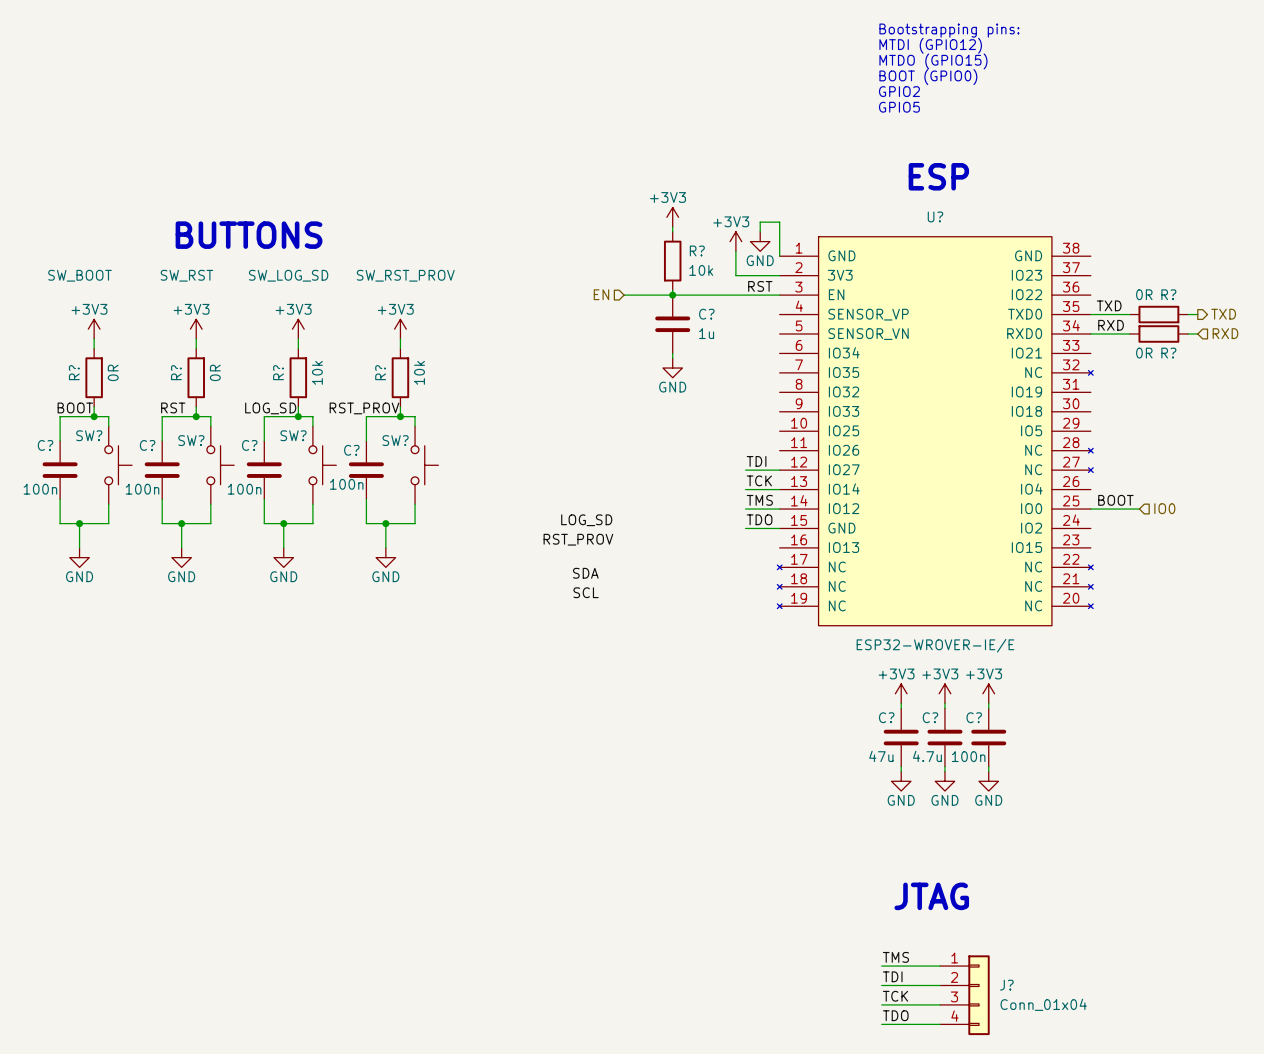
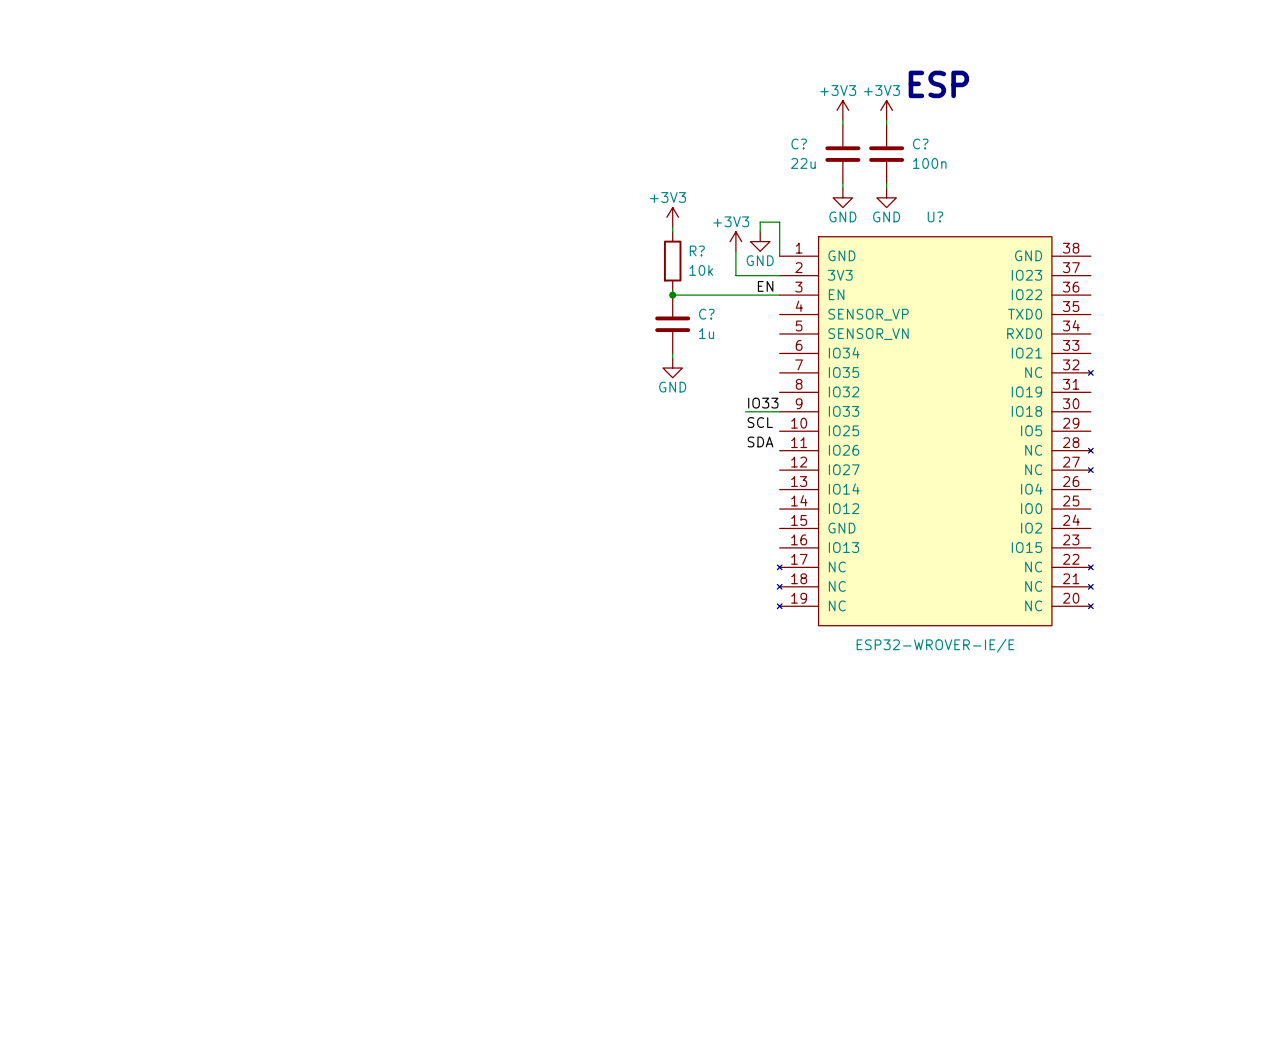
text: Bootstrapping pins: (949, 30) -> none
text: MTDI (GPIO12) (930, 45) -> none
text: MTDO (GPIO15) (933, 61) -> none
text: BOOT (GPIO0) (928, 77) -> none
text: GPIO2 (899, 91) -> none
text: GPIO5 (899, 107) -> none
power symbol: none -> +3V3 (842, 110)
power symbol: none -> +3V3 (886, 110)
wire: none -> (842, 120) (842, 124)
wire: none -> (886, 120) (886, 124)
C?: none -> 22u (842, 154)
C?: none -> 100n (886, 154)
text position: ESP (938, 176) -> ESP (938, 84)
wire: none -> (842, 183) (842, 188)
wire: none -> (886, 183) (886, 188)
power symbol: none -> GND (842, 197)
power symbol: none -> GND (886, 197)
text: BUTTONS (249, 235) -> none
label: RST (760, 286) -> none
label: none -> EN (765, 286)
hierarchical label: EN (601, 294) -> none
wire: (624, 295) (672, 295) -> none
label: TXD (1109, 305) -> none
wire: (1090, 314) (1129, 314) -> none
R?: 0R (1158, 314) -> none
wire: (1188, 314) (1197, 314) -> none
hierarchical label: TXD (1223, 314) -> none
label: RXD (1111, 325) -> none
power symbol: +3V3 (94, 329) -> none
power symbol: +3V3 (196, 329) -> none
power symbol: +3V3 (298, 329) -> none
power symbol: +3V3 (400, 329) -> none
wire: (1090, 333) (1129, 333) -> none
R?: 0R (1158, 333) -> none
wire: (1188, 333) (1197, 333) -> none
hierarchical label: RXD (1225, 333) -> none
wire: (94, 338) (94, 348) -> none
wire: (196, 338) (196, 348) -> none
wire: (298, 338) (298, 348) -> none
wire: (400, 338) (400, 348) -> none
R?: 0R (94, 377) -> none
R?: 0R (196, 377) -> none
R?: 10k (298, 377) -> none
R?: 10k (400, 377) -> none
label: none -> IO33 (763, 403)
wire: (94, 406) (94, 416) -> none
wire: (196, 406) (196, 416) -> none
wire: (298, 406) (298, 416) -> none
wire: (400, 406) (400, 416) -> none
label: BOOT (75, 407) -> none
label: RST (173, 407) -> none
label: LOG_SD (270, 408) -> none
label: RST_PROV (364, 408) -> none
junction: (94, 416) -> none
junction: (196, 416) -> none
junction: (298, 416) -> none
junction: (400, 416) -> none
label: none -> SCL (760, 422)
wire: (108, 426) (108, 416) (60, 416) (60, 440) -> none
wire: (210, 426) (210, 416) (162, 416) (162, 440) -> none
wire: (312, 426) (312, 416) (264, 416) (264, 440) -> none
wire: (415, 426) (415, 416) (366, 416) (366, 440) -> none
label: none -> SDA (760, 442)
label: TDI (756, 461) -> none
SW?: SW_BOOT (118, 465) -> none
SW?: SW_RST (220, 465) -> none
SW?: SW_LOG_SD (322, 465) -> none
SW?: SW_RST_PROV (424, 465) -> none
C?: 100n (60, 470) -> none
C?: 100n (162, 470) -> none
C?: 100n (264, 470) -> none
C?: 100n (366, 470) -> none
wire: (745, 470) (779, 470) -> (745, 411) (779, 411)
label: TCK (759, 480) -> none
wire: (745, 489) (779, 489) -> none
wire: (60, 499) (60, 523) (108, 523) (108, 504) -> none
wire: (162, 499) (162, 523) (210, 523) (210, 504) -> none
wire: (264, 499) (264, 523) (312, 523) (312, 504) -> none
wire: (366, 499) (366, 523) (415, 523) (415, 504) -> none
label: TMS (759, 500) -> none
label: BOOT (1115, 500) -> none
hierarchical label: IO0 (1164, 508) -> none
wire: (745, 509) (779, 509) -> none
wire: (1090, 509) (1139, 509) -> none
label: TDO (759, 519) -> none
label: LOG_SD (586, 520) -> none
wire: (79, 523) (79, 547) -> none
junction: (79, 523) -> none
wire: (181, 523) (181, 547) -> none
junction: (181, 523) -> none
wire: (283, 523) (283, 547) -> none
junction: (283, 523) -> none
wire: (385, 523) (385, 547) -> none
junction: (385, 523) -> none
wire: (745, 528) (779, 528) -> none
label: RST_PROV (578, 539) -> none
power symbol: GND (79, 557) -> none
power symbol: GND (181, 557) -> none
power symbol: GND (283, 557) -> none
power symbol: GND (385, 557) -> none
label: SDA (585, 573) -> none
label: SCL (586, 592) -> none
power symbol: +3V3 (901, 693) -> none
power symbol: +3V3 (944, 693) -> none
power symbol: +3V3 (988, 693) -> none
wire: (901, 703) (901, 708) -> none
wire: (944, 703) (944, 708) -> none
wire: (988, 703) (988, 708) -> none
C?: 47u (901, 737) -> none
C?: 4.7u (944, 737) -> none
C?: 100n (988, 737) -> none
wire: (901, 766) (901, 771) -> none
wire: (944, 766) (944, 771) -> none
wire: (988, 766) (988, 771) -> none
power symbol: GND (901, 781) -> none
power symbol: GND (944, 781) -> none
power symbol: GND (988, 781) -> none
text: JTAG (931, 896) -> none
label: TMS (895, 957) -> none
wire: (881, 966) (940, 966) -> none
label: TDI (892, 976) -> none
wire: (881, 985) (940, 985) -> none
J?: Conn_01x04 (964, 995) -> none
label: TCK (895, 996) -> none
wire: (881, 1004) (940, 1004) -> none
label: TDO (895, 1015) -> none
wire: (881, 1024) (940, 1024) -> none

